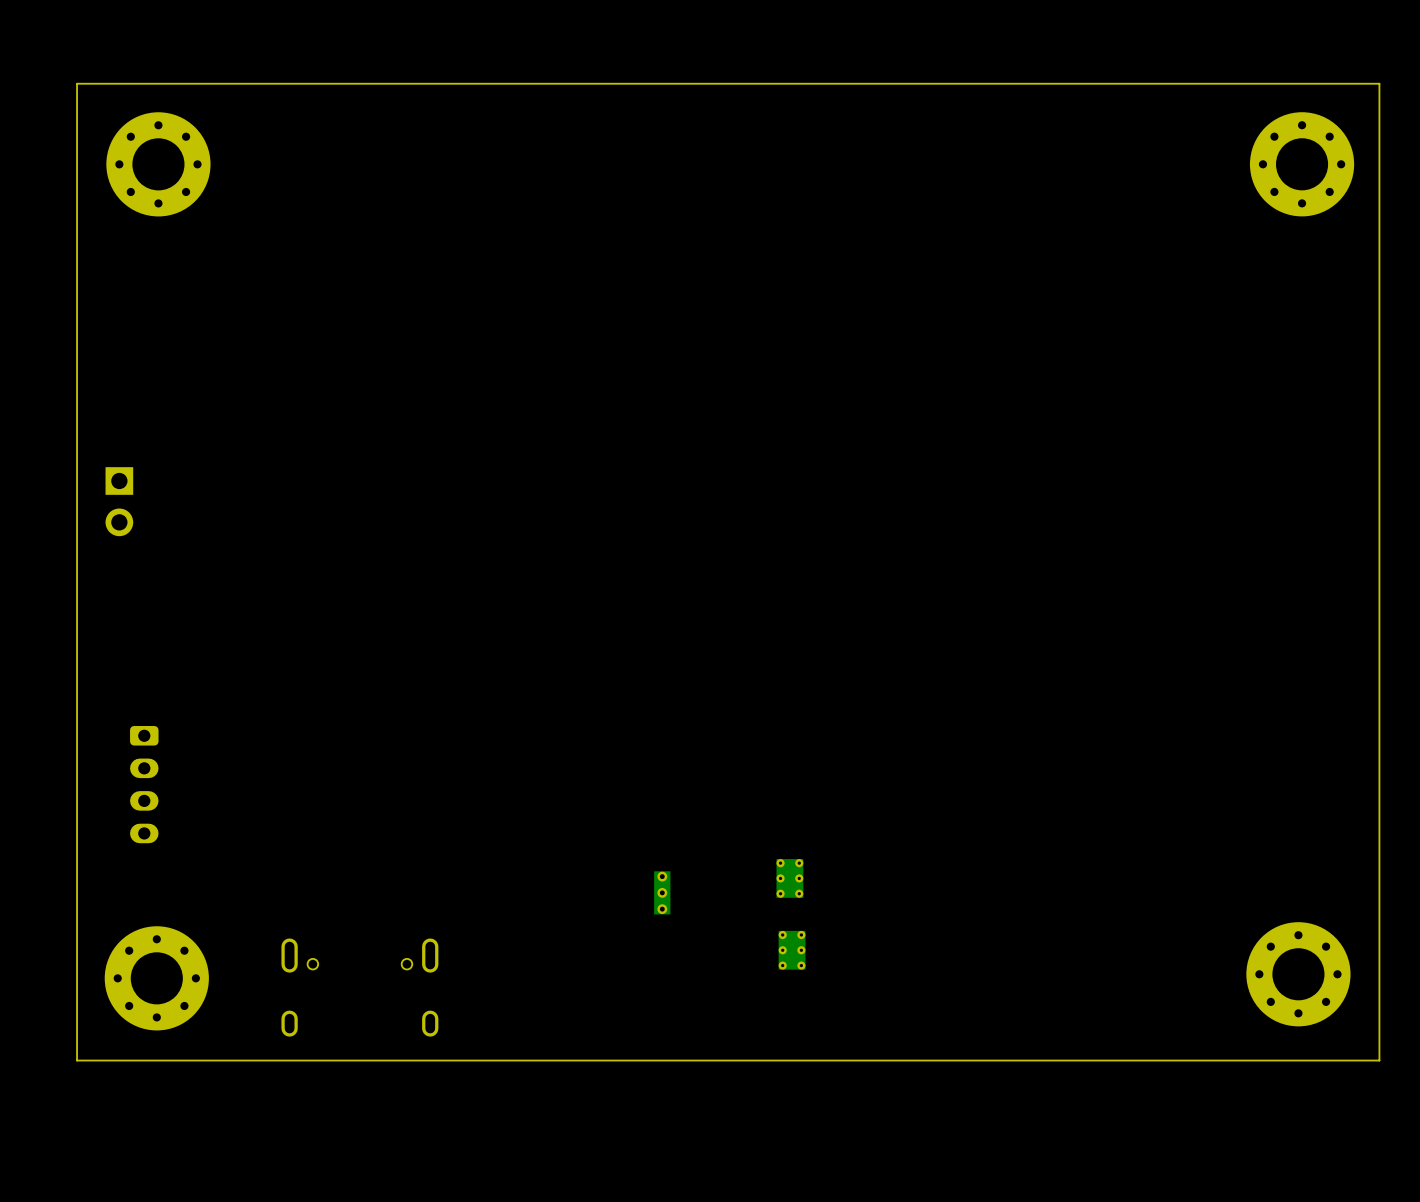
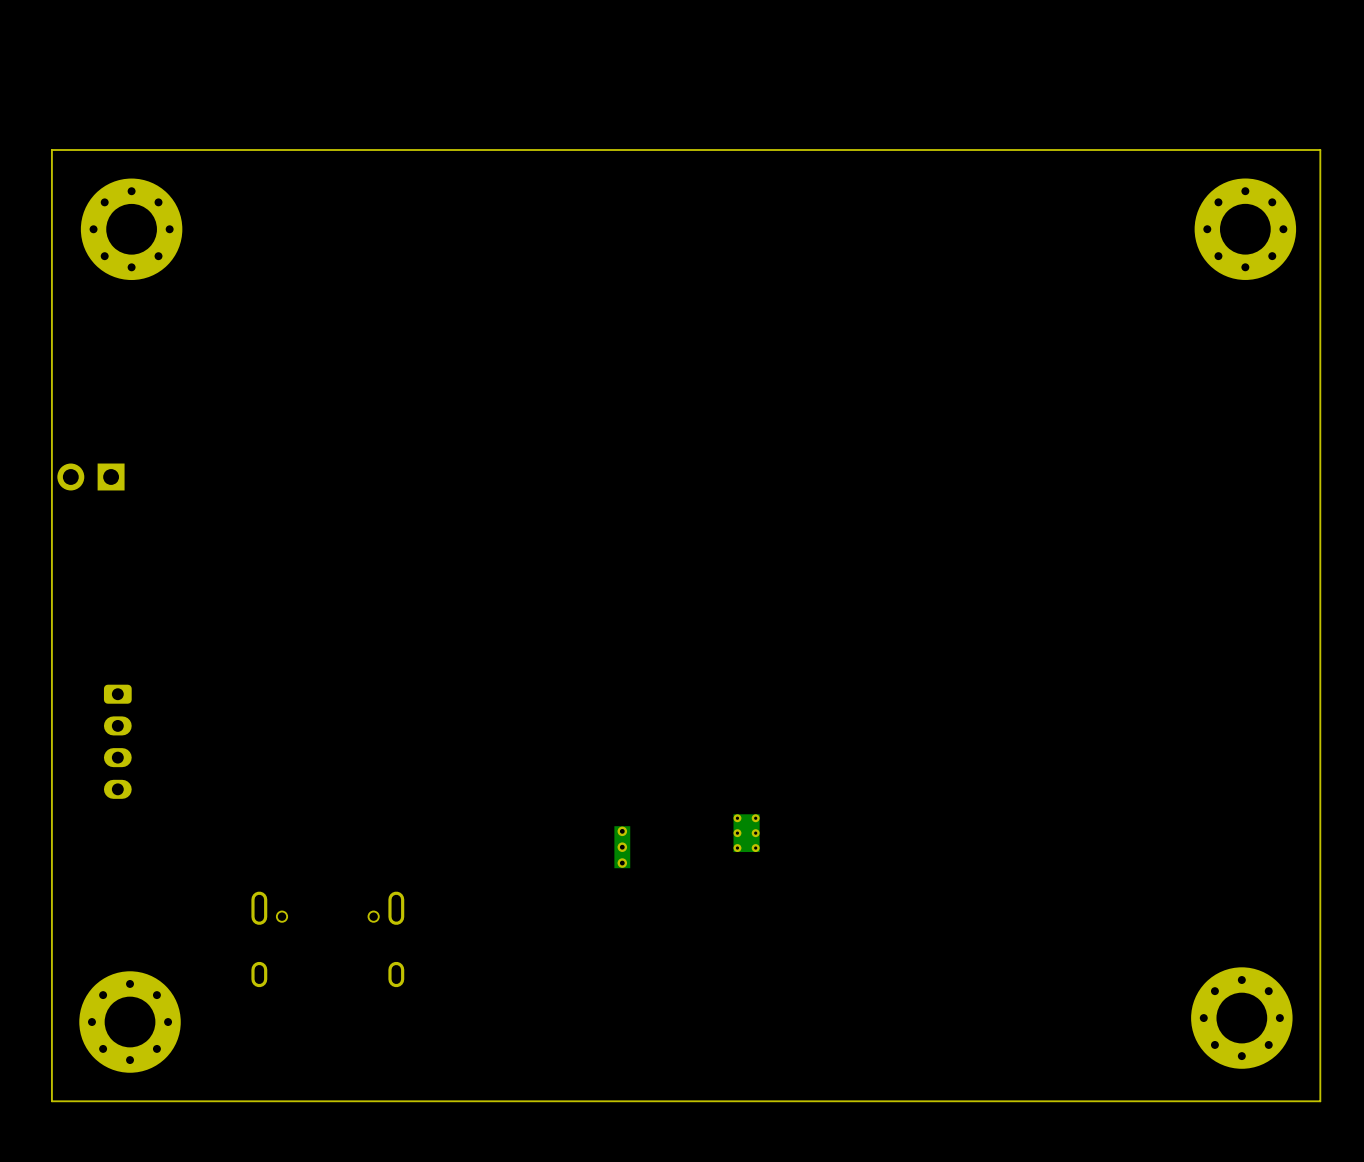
board edge: (1379, 83) (77, 83) (77, 1060) (1379, 1060) (1379, 83) -> (1320, 150) (1320, 1101) (51, 1101) (51, 150) (1320, 150)
part position: (158, 164) -> (131, 229)
part position: (1302, 164) -> (1245, 229)
part rotation: 0° (119, 501) -> 90° clockwise (90, 477)
part: (792, 950) -> none
part position: (1298, 974) -> (1241, 1018)
part position: (156, 978) -> (130, 1022)

